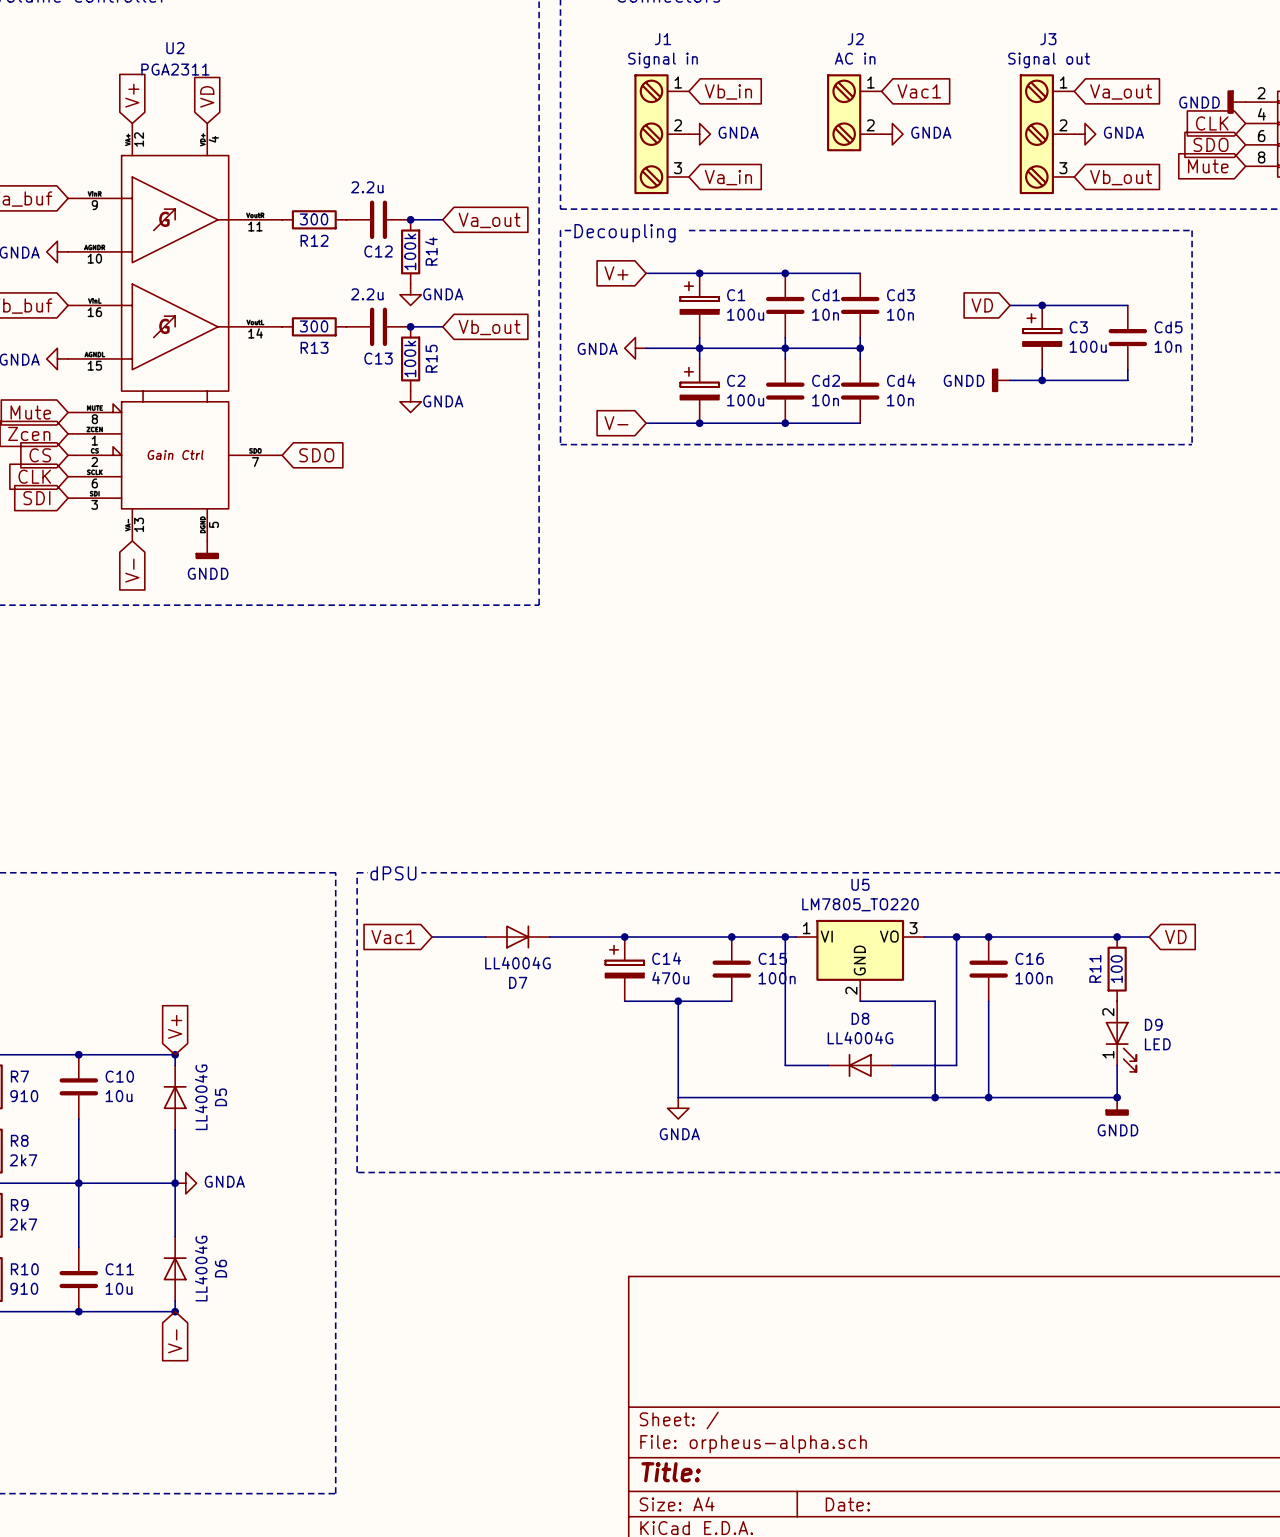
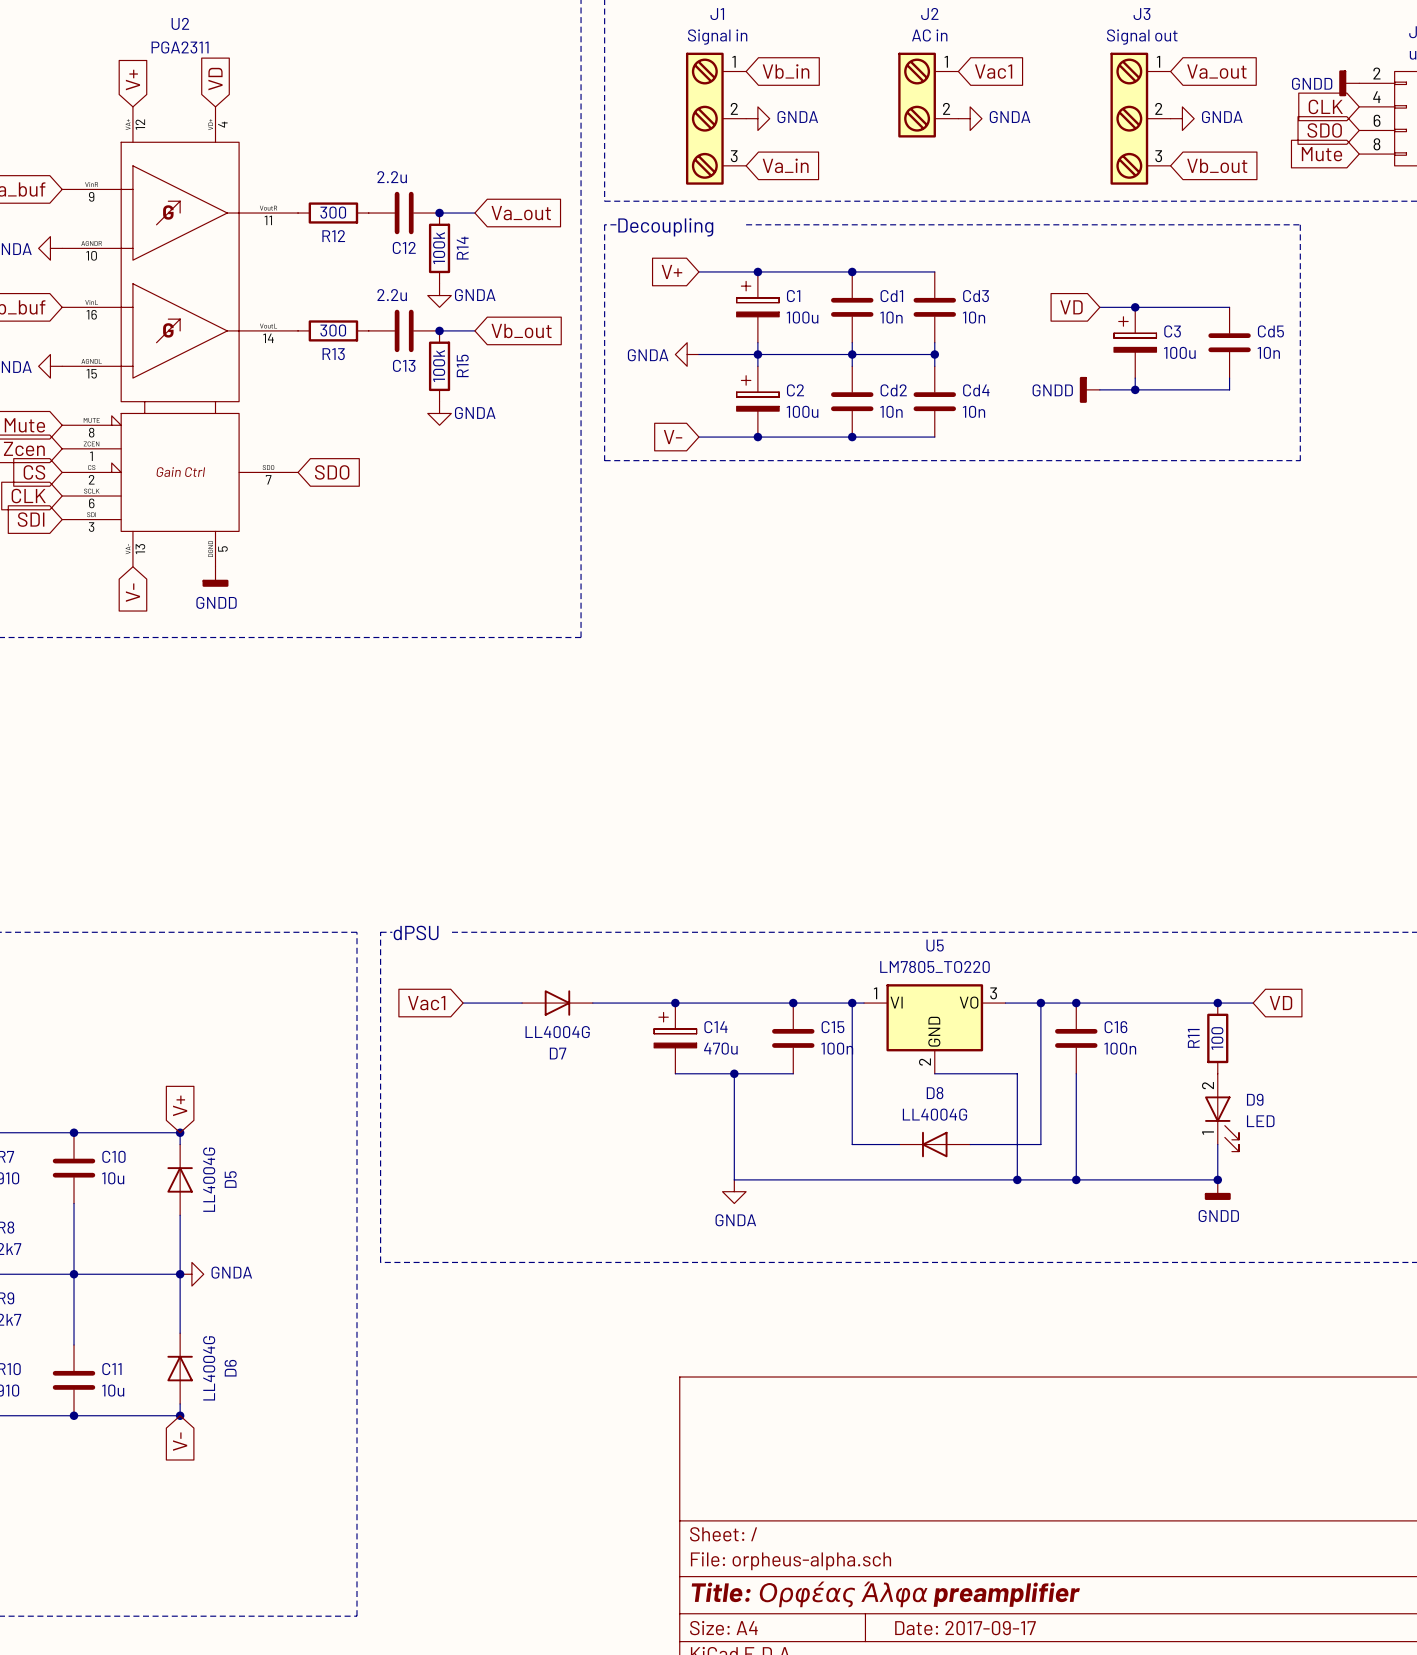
title block: Title: (671, 1472) -> Title: Ορφέας Άλφα preamplifier (885, 1594)
title block: Date: (847, 1504) -> Date: 2017-09-17 (965, 1628)

